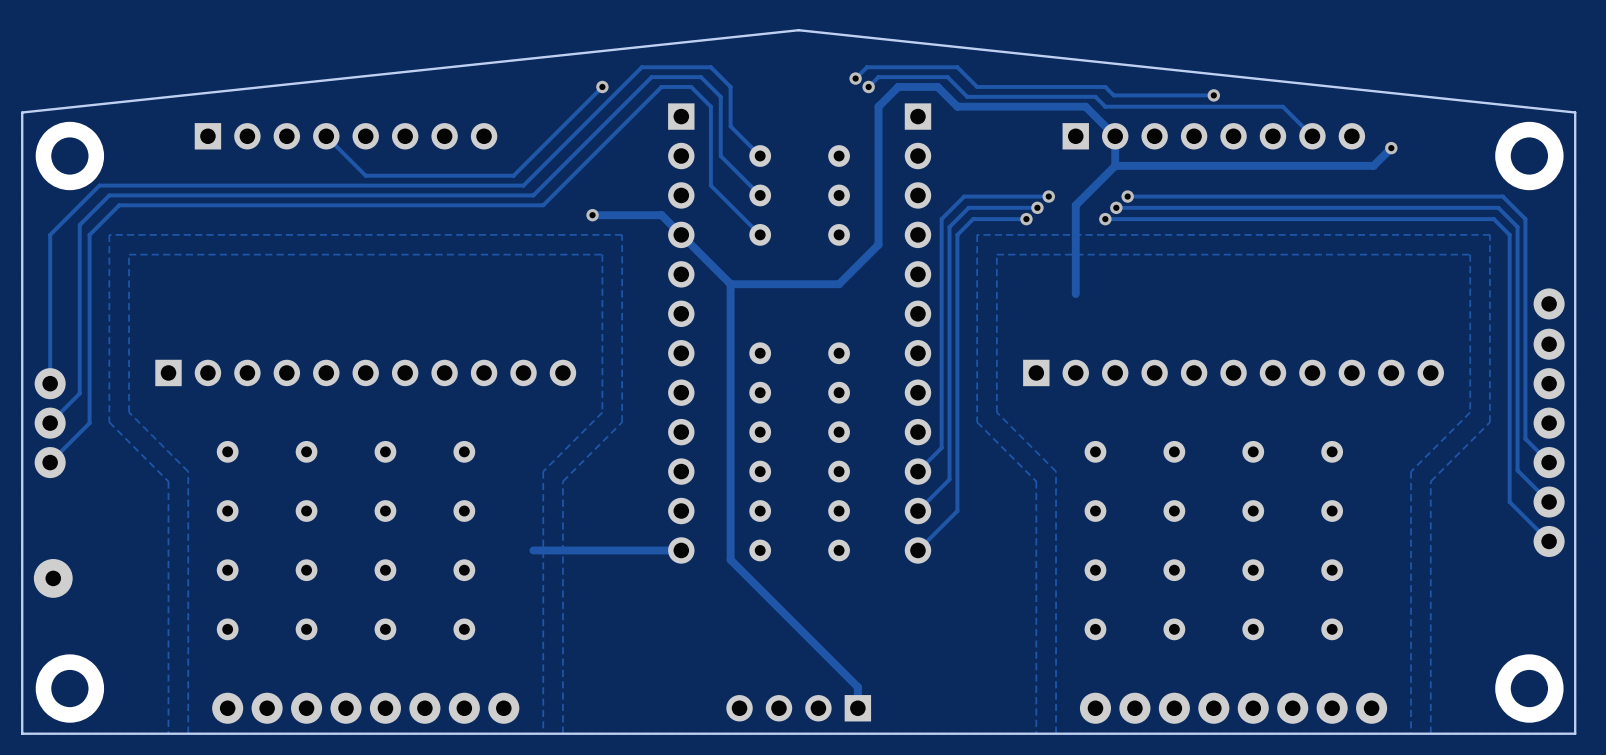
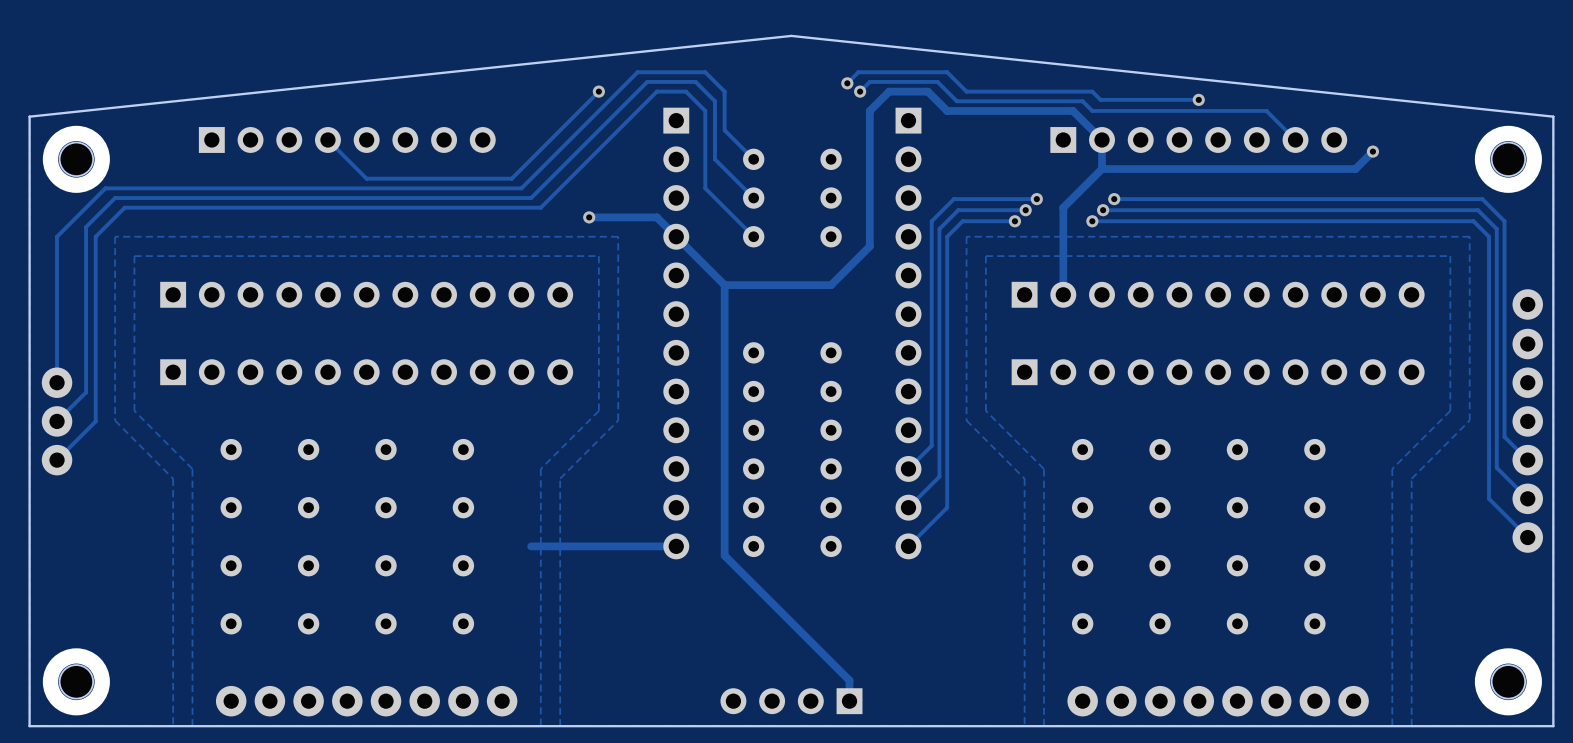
part: none -> (76, 159)
part: none -> (1508, 159)
part: none -> (366, 294)
part: none -> (1218, 294)
part: (53, 578) -> none
part: none -> (76, 681)
part: none -> (1508, 681)

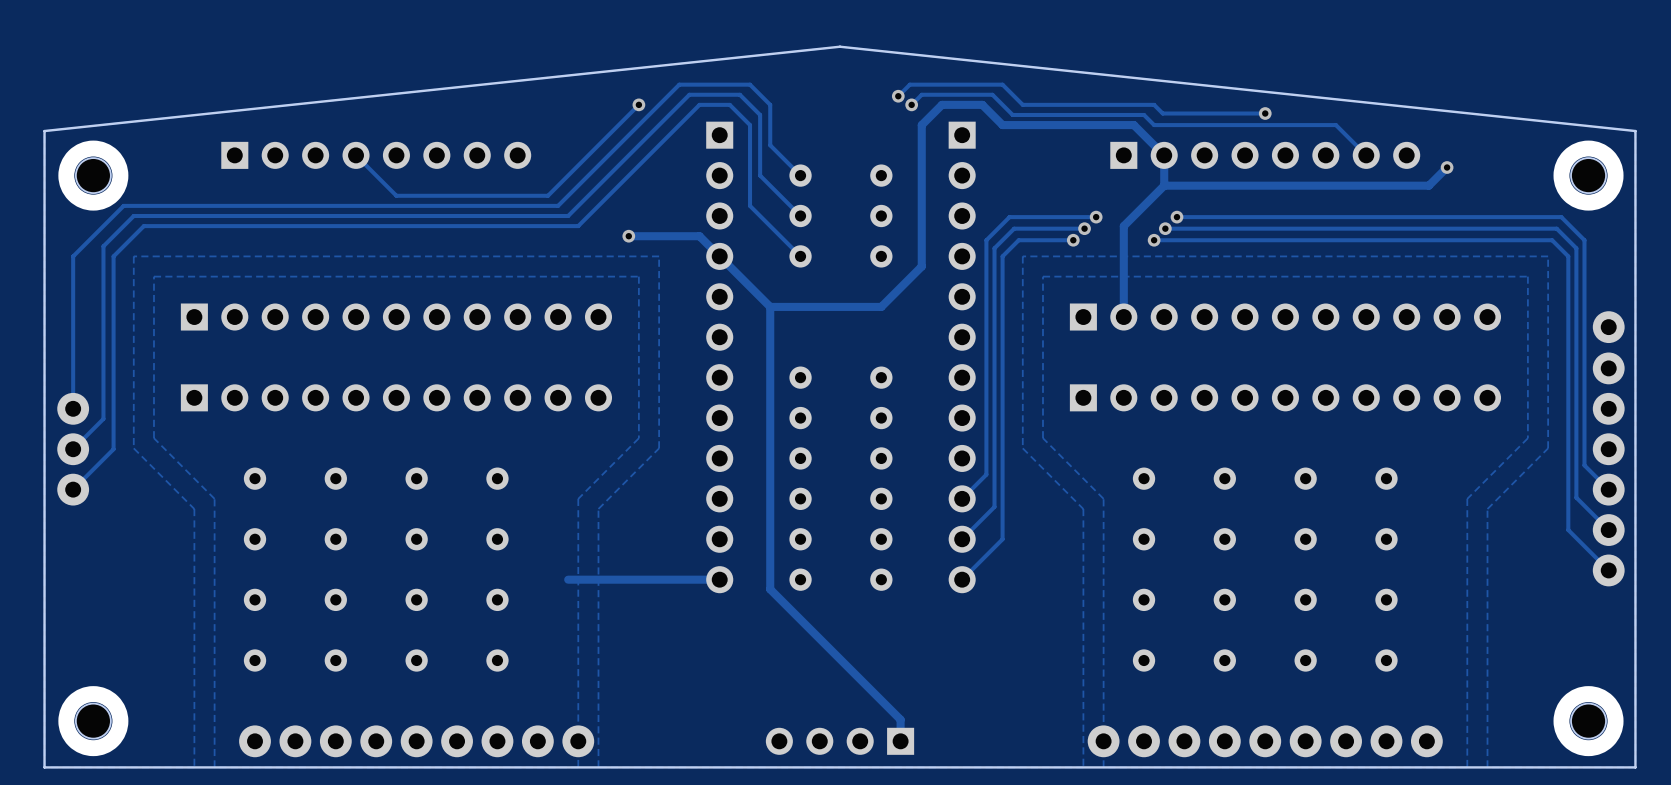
part: none -> (578, 741)
part: none -> (1103, 741)

